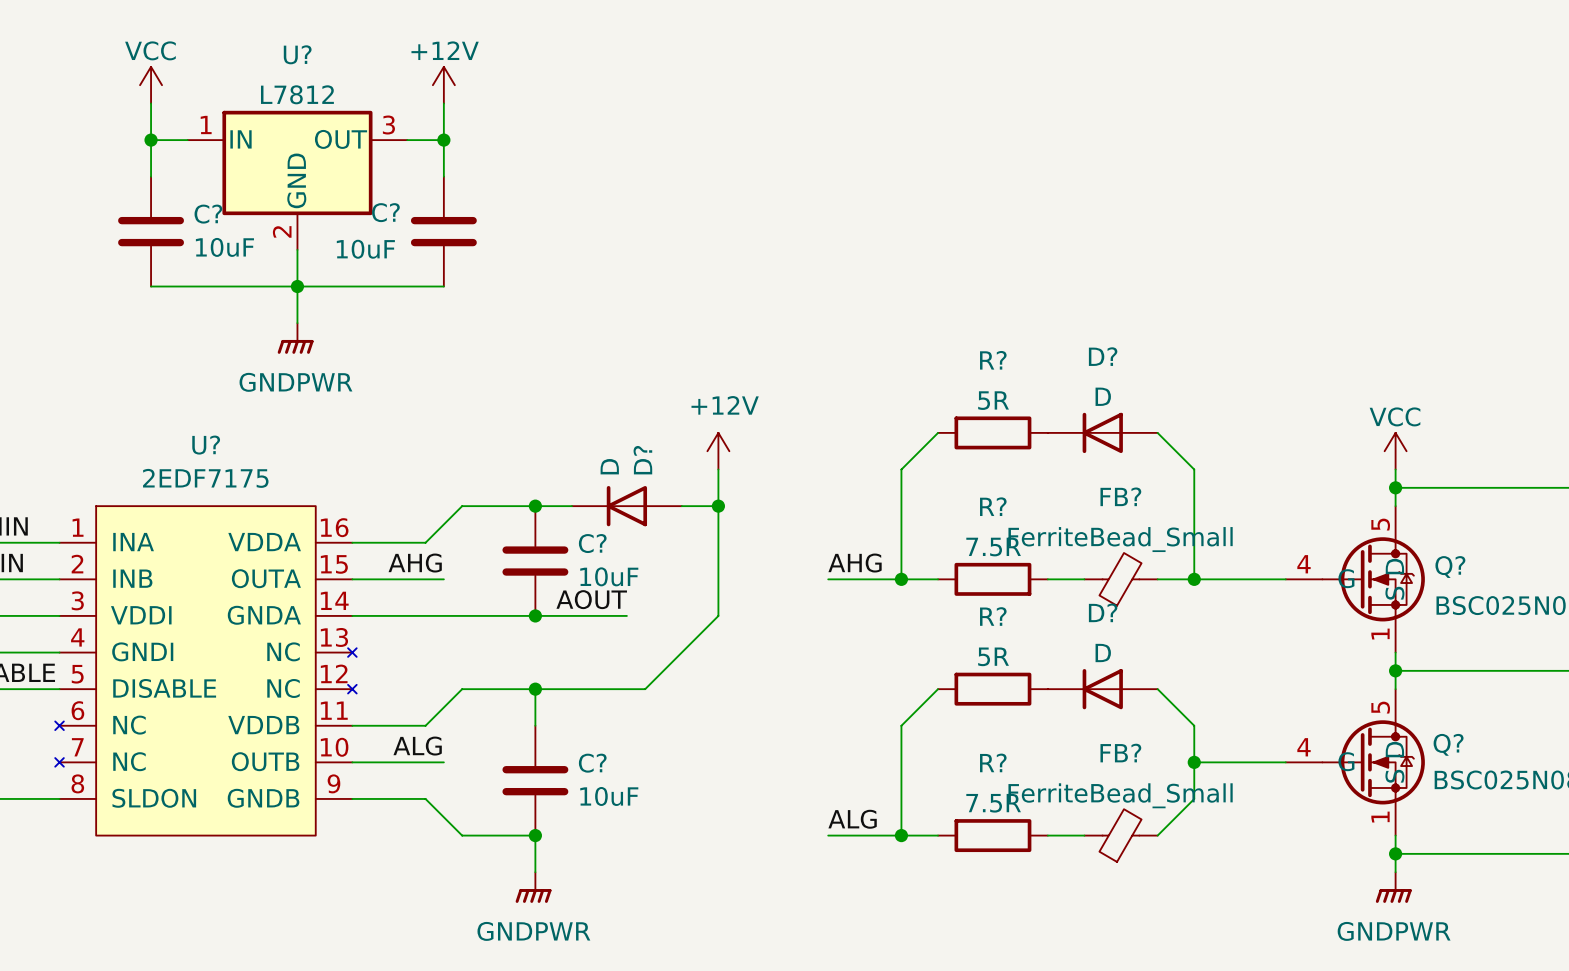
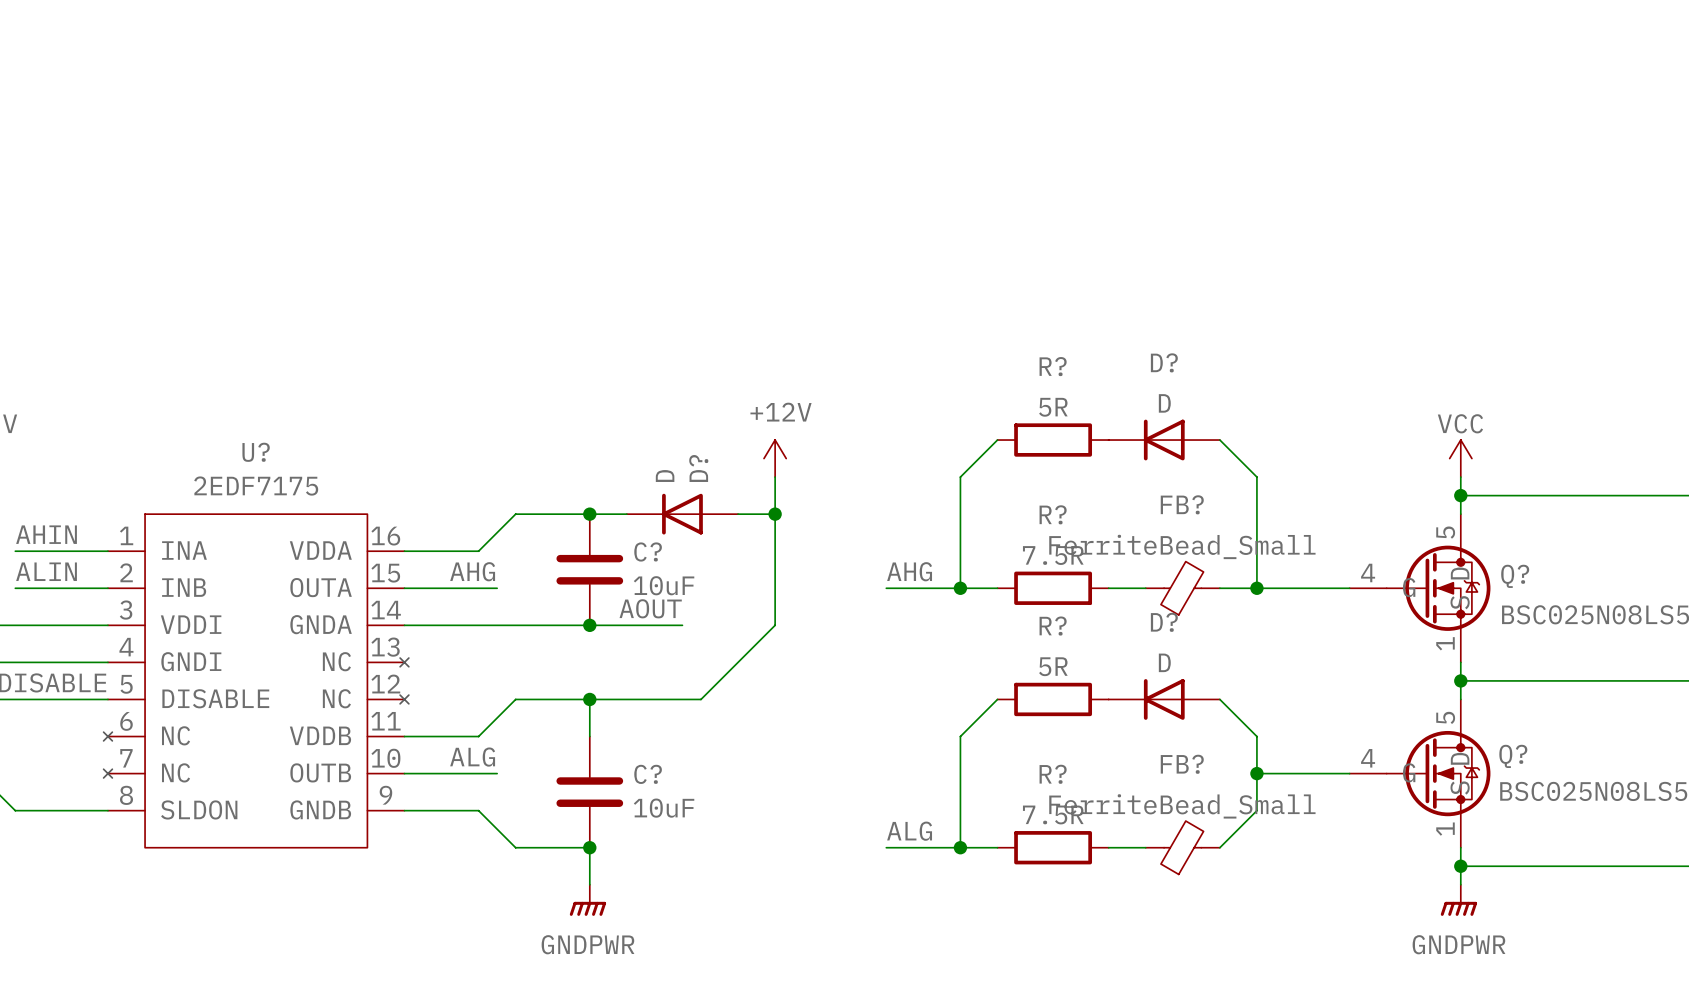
power symbol: VCC (151, 85) -> none
power symbol: +12V (443, 85) -> none
wire: (151, 103) (151, 176) -> none
wire: (443, 103) (443, 176) -> none
wire: (151, 140) (187, 140) -> none
junction: (151, 140) -> none
wire: (407, 140) (443, 140) -> none
junction: (443, 140) -> none
U?: L7812 (297, 180) -> none
C?: 10uF (151, 231) -> none
C?: 10uF (443, 231) -> none
wire: (297, 249) (297, 323) -> none
wire: (151, 286) (443, 286) -> none
junction: (297, 286) -> none
power symbol: GNDPWR (295, 338) -> none

